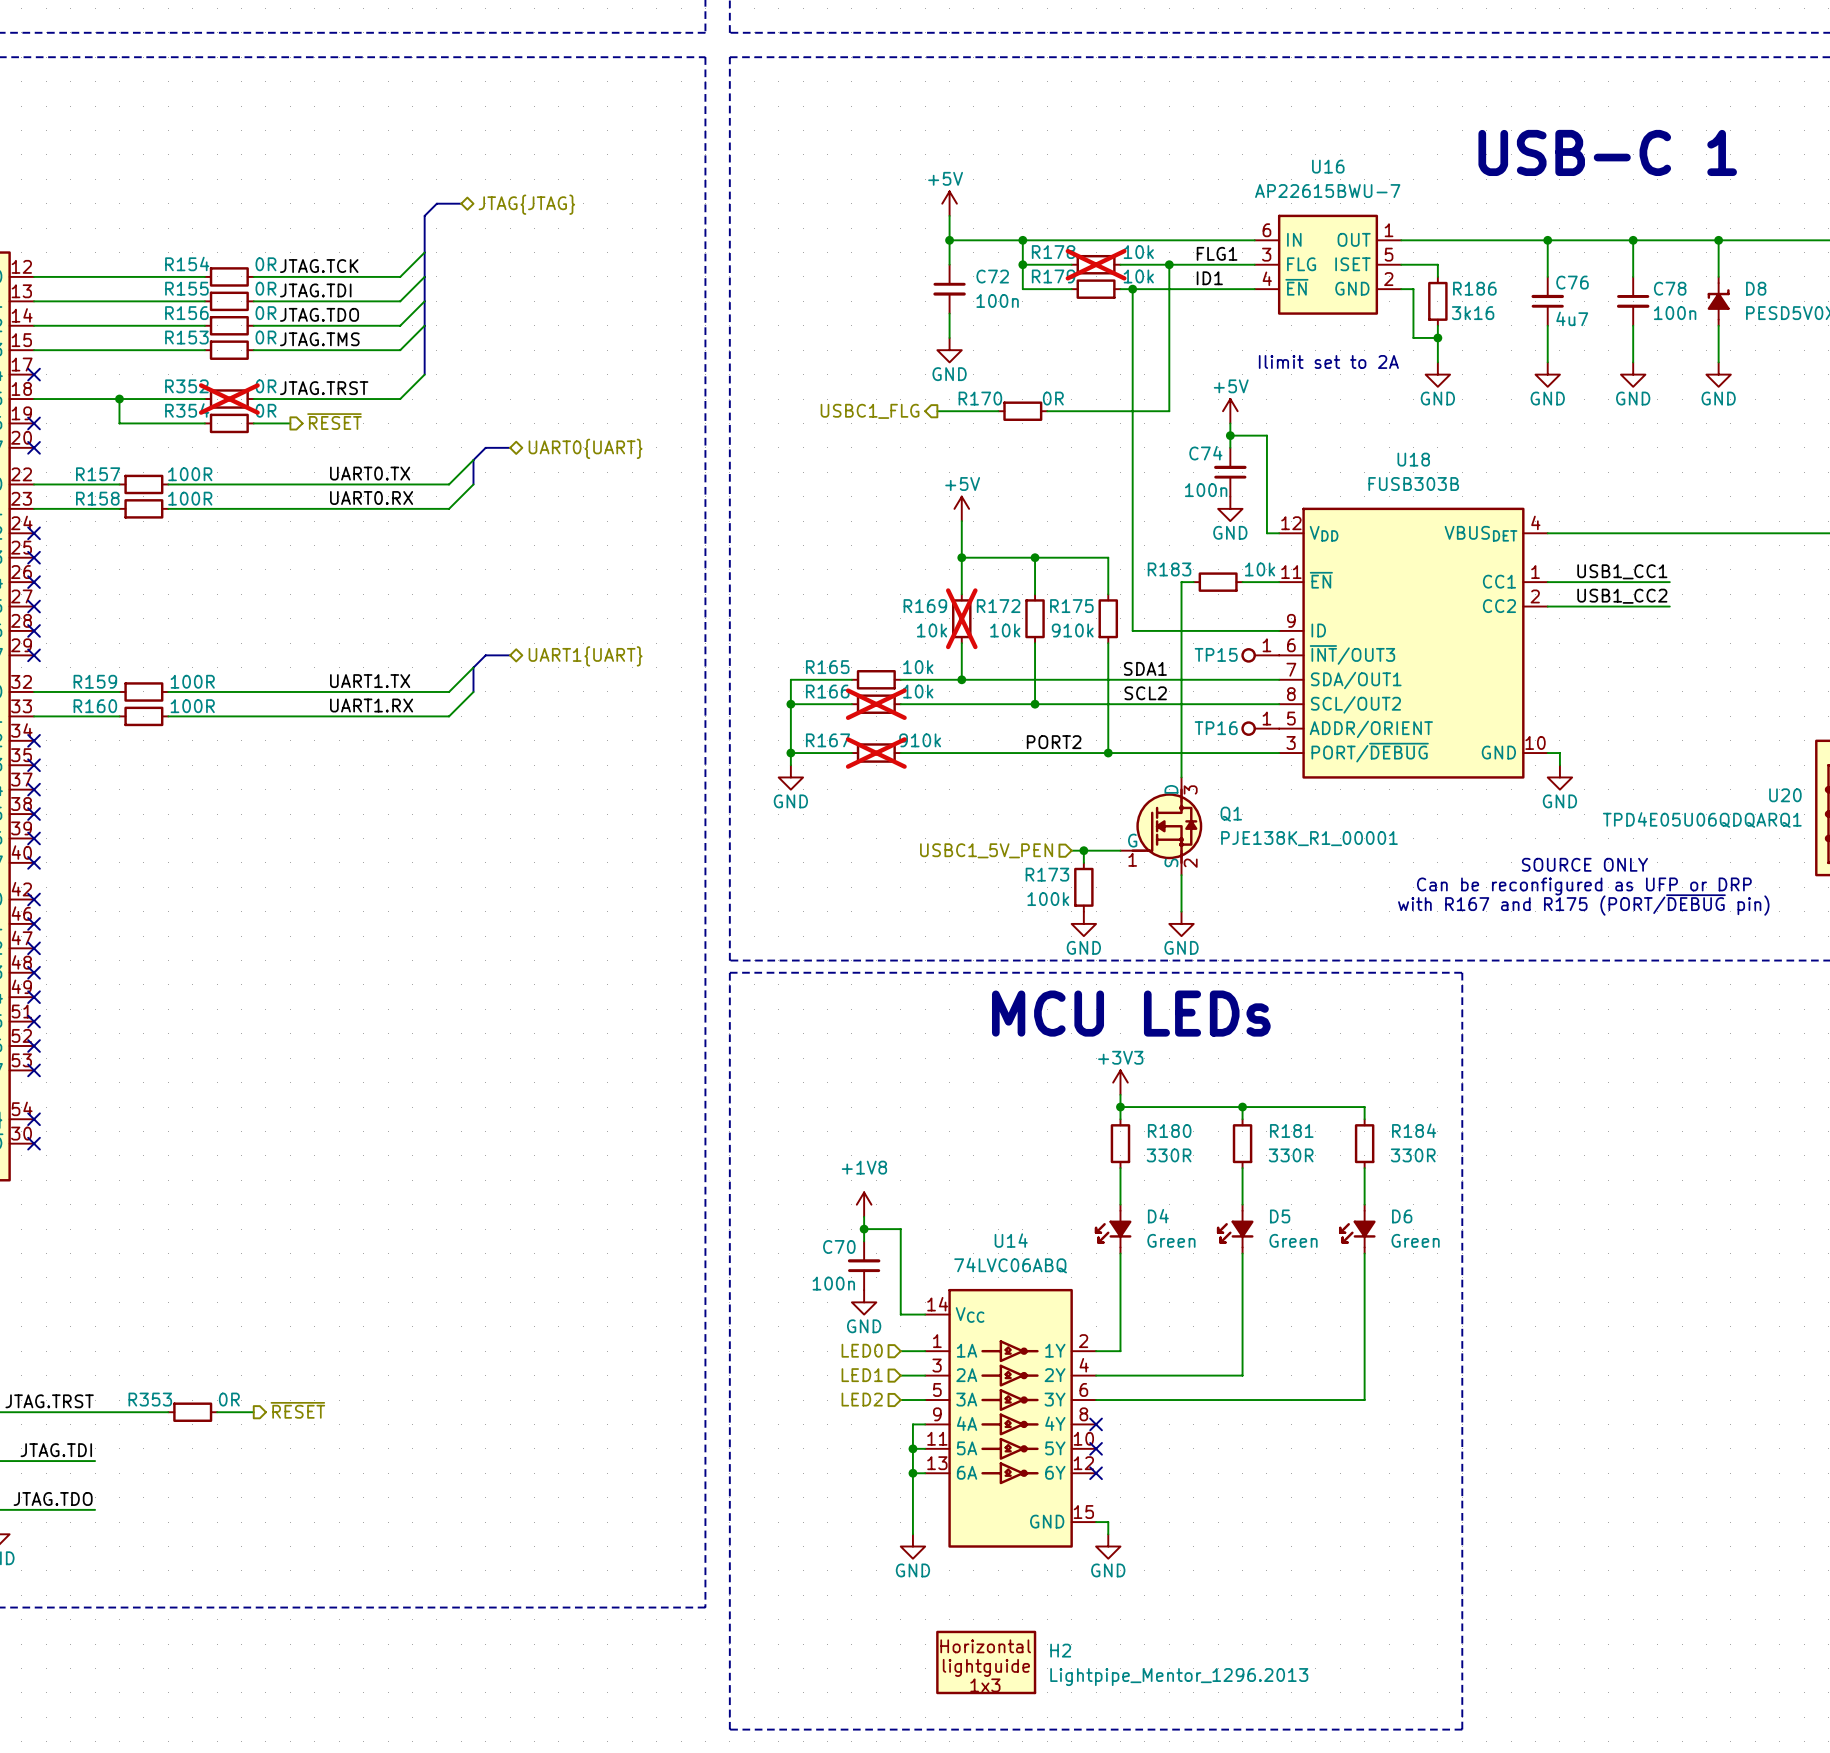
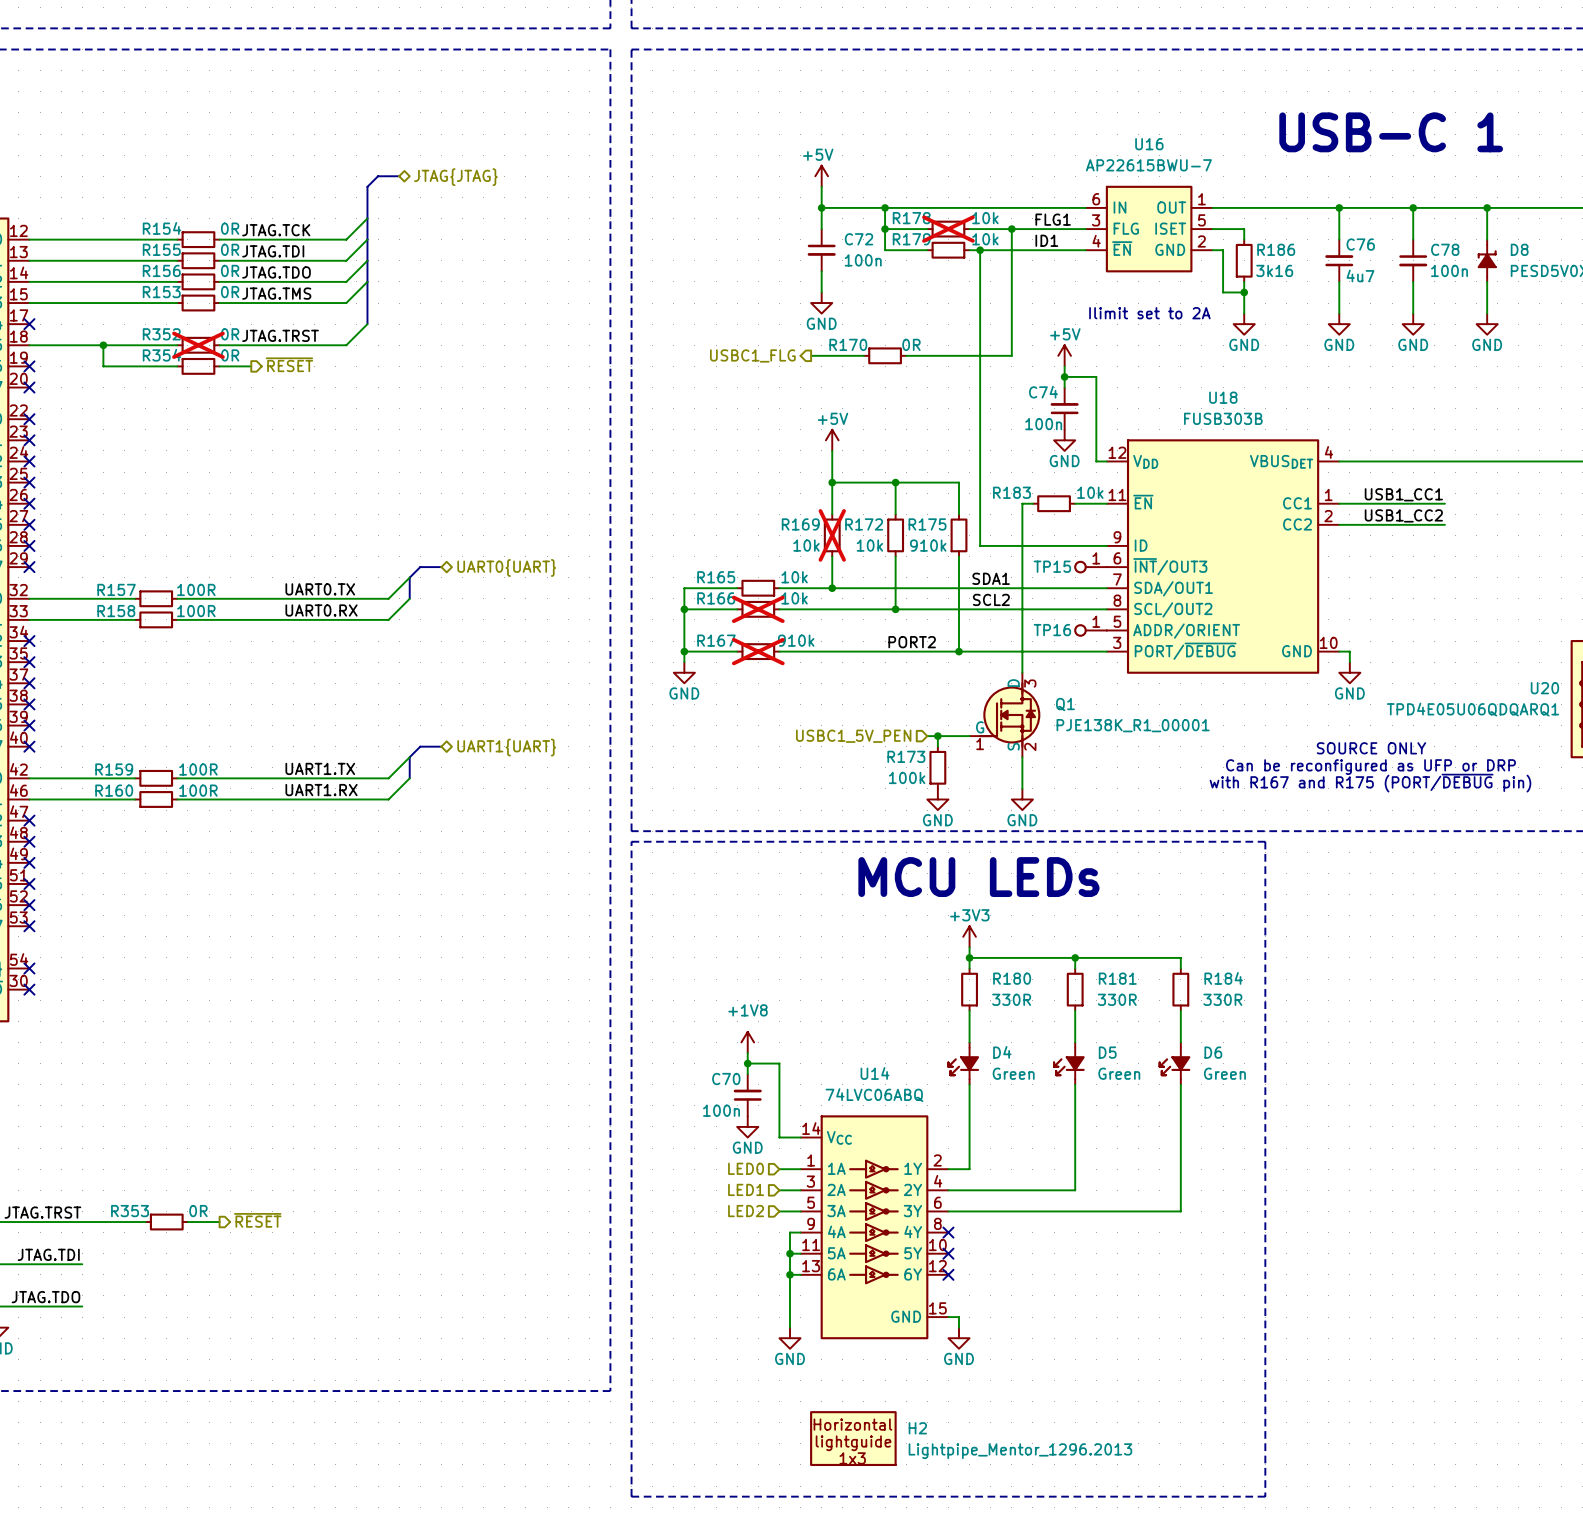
bus: (510, 447) (485, 447) (473, 460) (473, 484) -> none
hierarchical label: UART0{UART} (585, 448) -> none
wire: (473, 460) (449, 484) (168, 484) -> none
label: UART0.TX (370, 473) -> none
wire: (34, 484) (119, 484) -> none
no-connect mark: none -> (29, 419)
R157 position: (143, 484) -> (156, 598)
wire: (473, 484) (449, 508) (168, 508) -> none
label: UART0.RX (371, 497) -> none
wire: (34, 508) (119, 508) -> none
no-connect mark: none -> (29, 440)
R158 position: (143, 508) -> (156, 619)
hierarchical label: UART1{UART} (585, 656) -> UART0{UART} (506, 567)
label: UART1.TX (370, 681) -> UART0.TX (320, 589)
R159 position: (143, 691) -> (156, 778)
wire: (168, 691) (204, 691) -> (103, 598) (135, 598)
label: UART1.RX (371, 705) -> UART0.RX (321, 610)
R160 position: (143, 716) -> (156, 799)
wire: (168, 716) (204, 716) -> (103, 619) (135, 619)
bus: none -> (441, 746) (420, 746) (409, 757) (409, 778)
hierarchical label: none -> UART1{UART} (506, 747)
wire: none -> (409, 757) (388, 778) (177, 778)
label: none -> UART1.TX (320, 768)
wire: none -> (29, 778) (135, 778)
no-connect mark: (34, 899) -> none
wire: none -> (409, 778) (388, 799) (177, 799)
label: none -> UART1.RX (321, 790)
wire: none -> (29, 799) (135, 799)
no-connect mark: (34, 923) -> none

